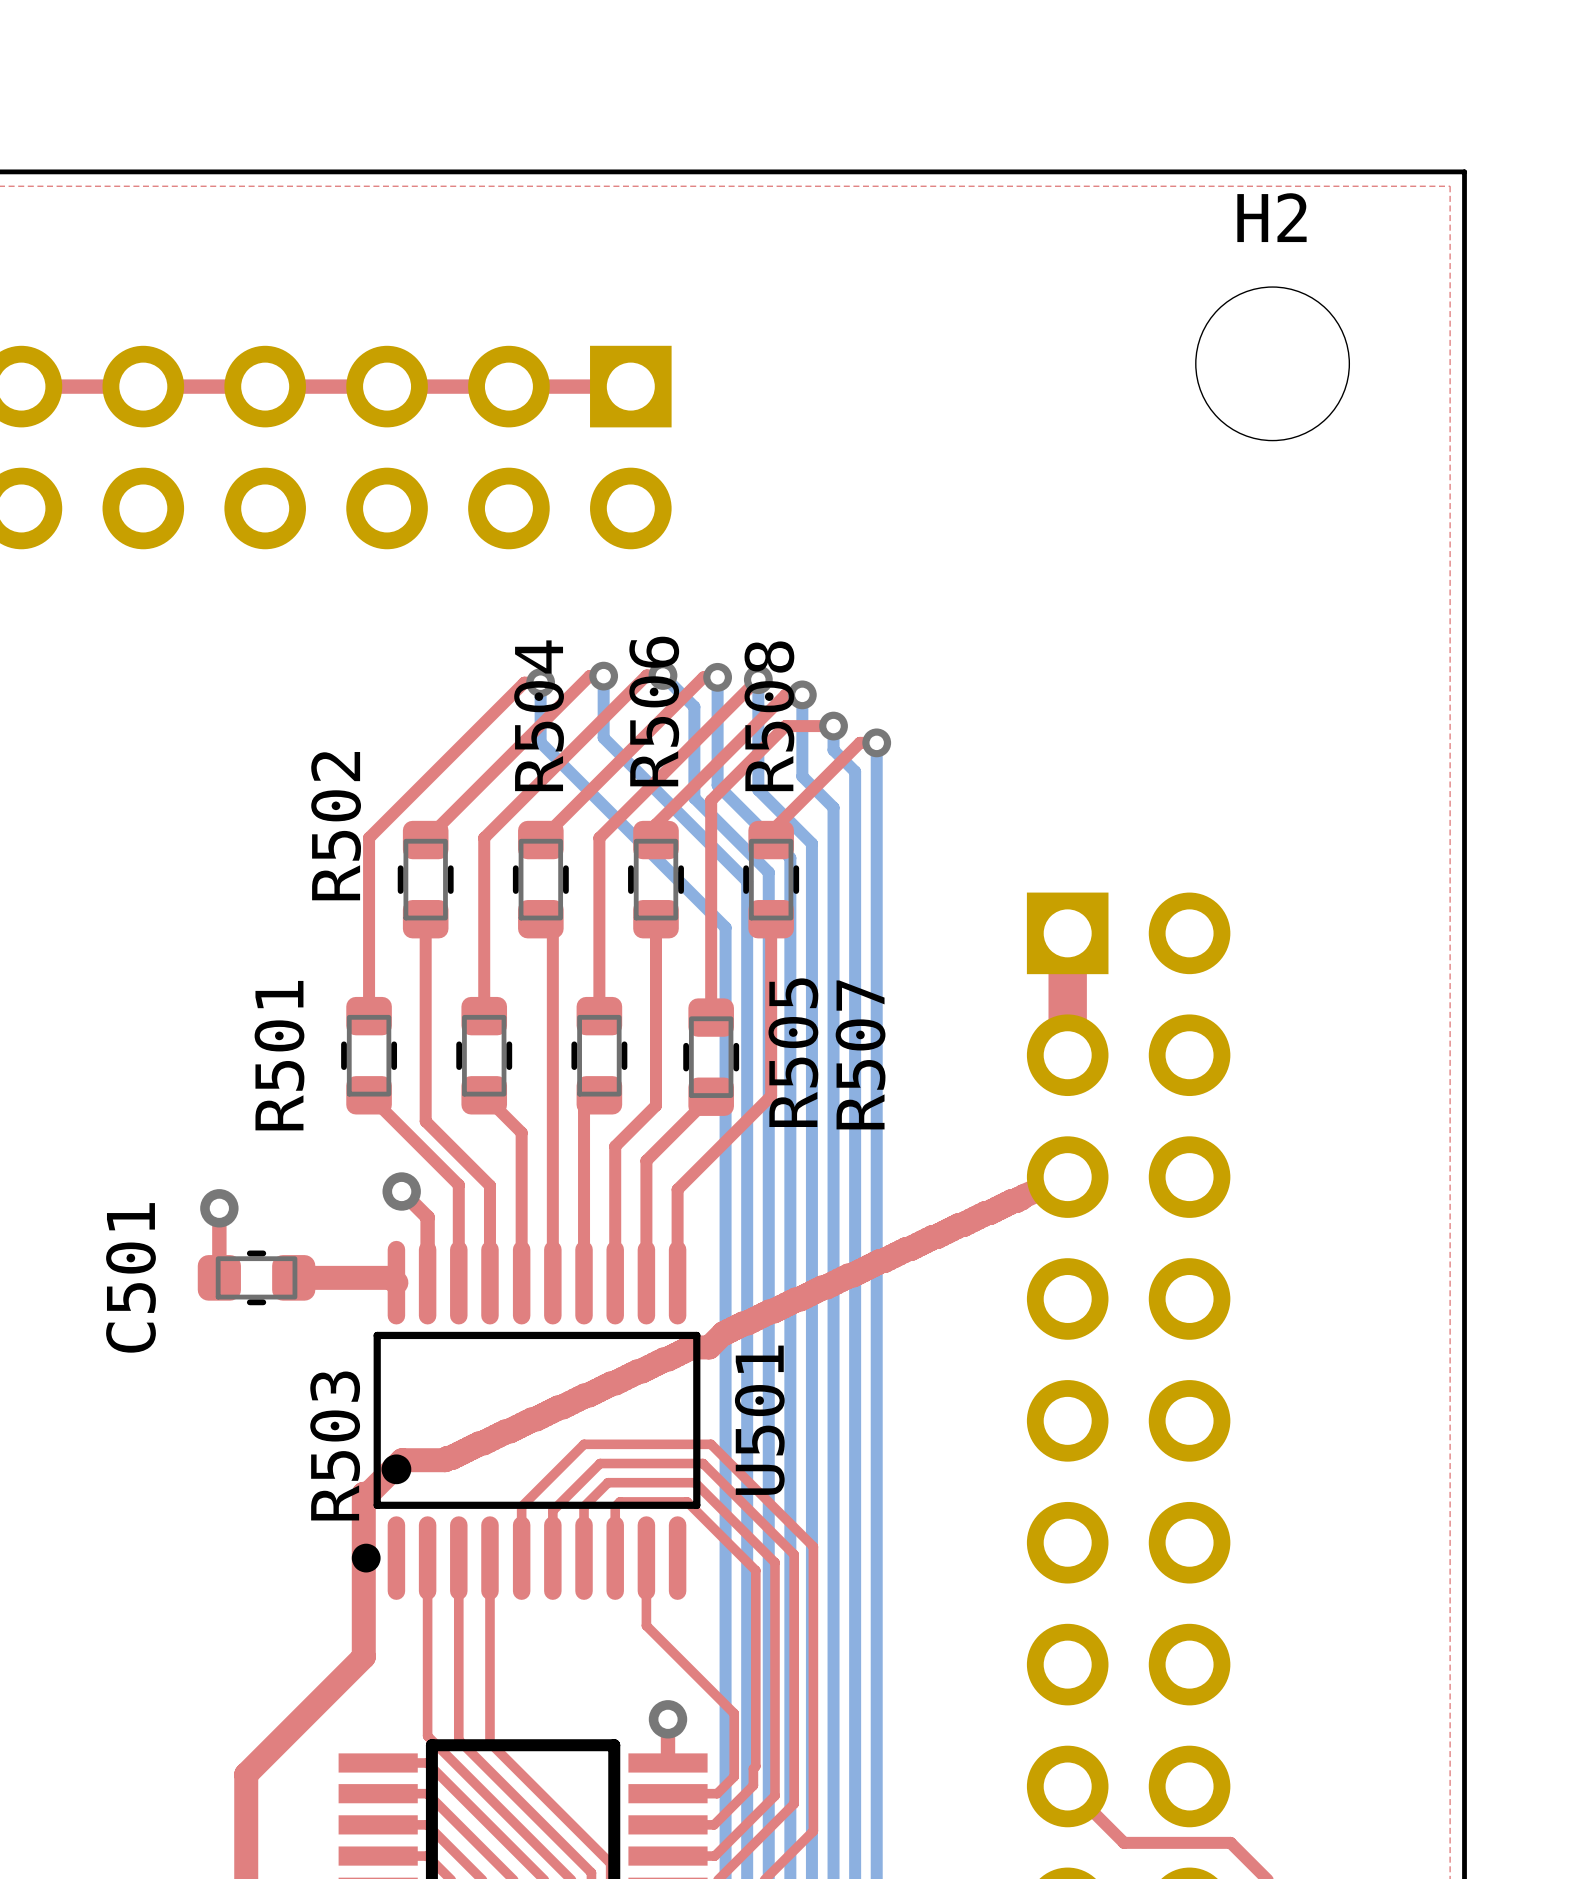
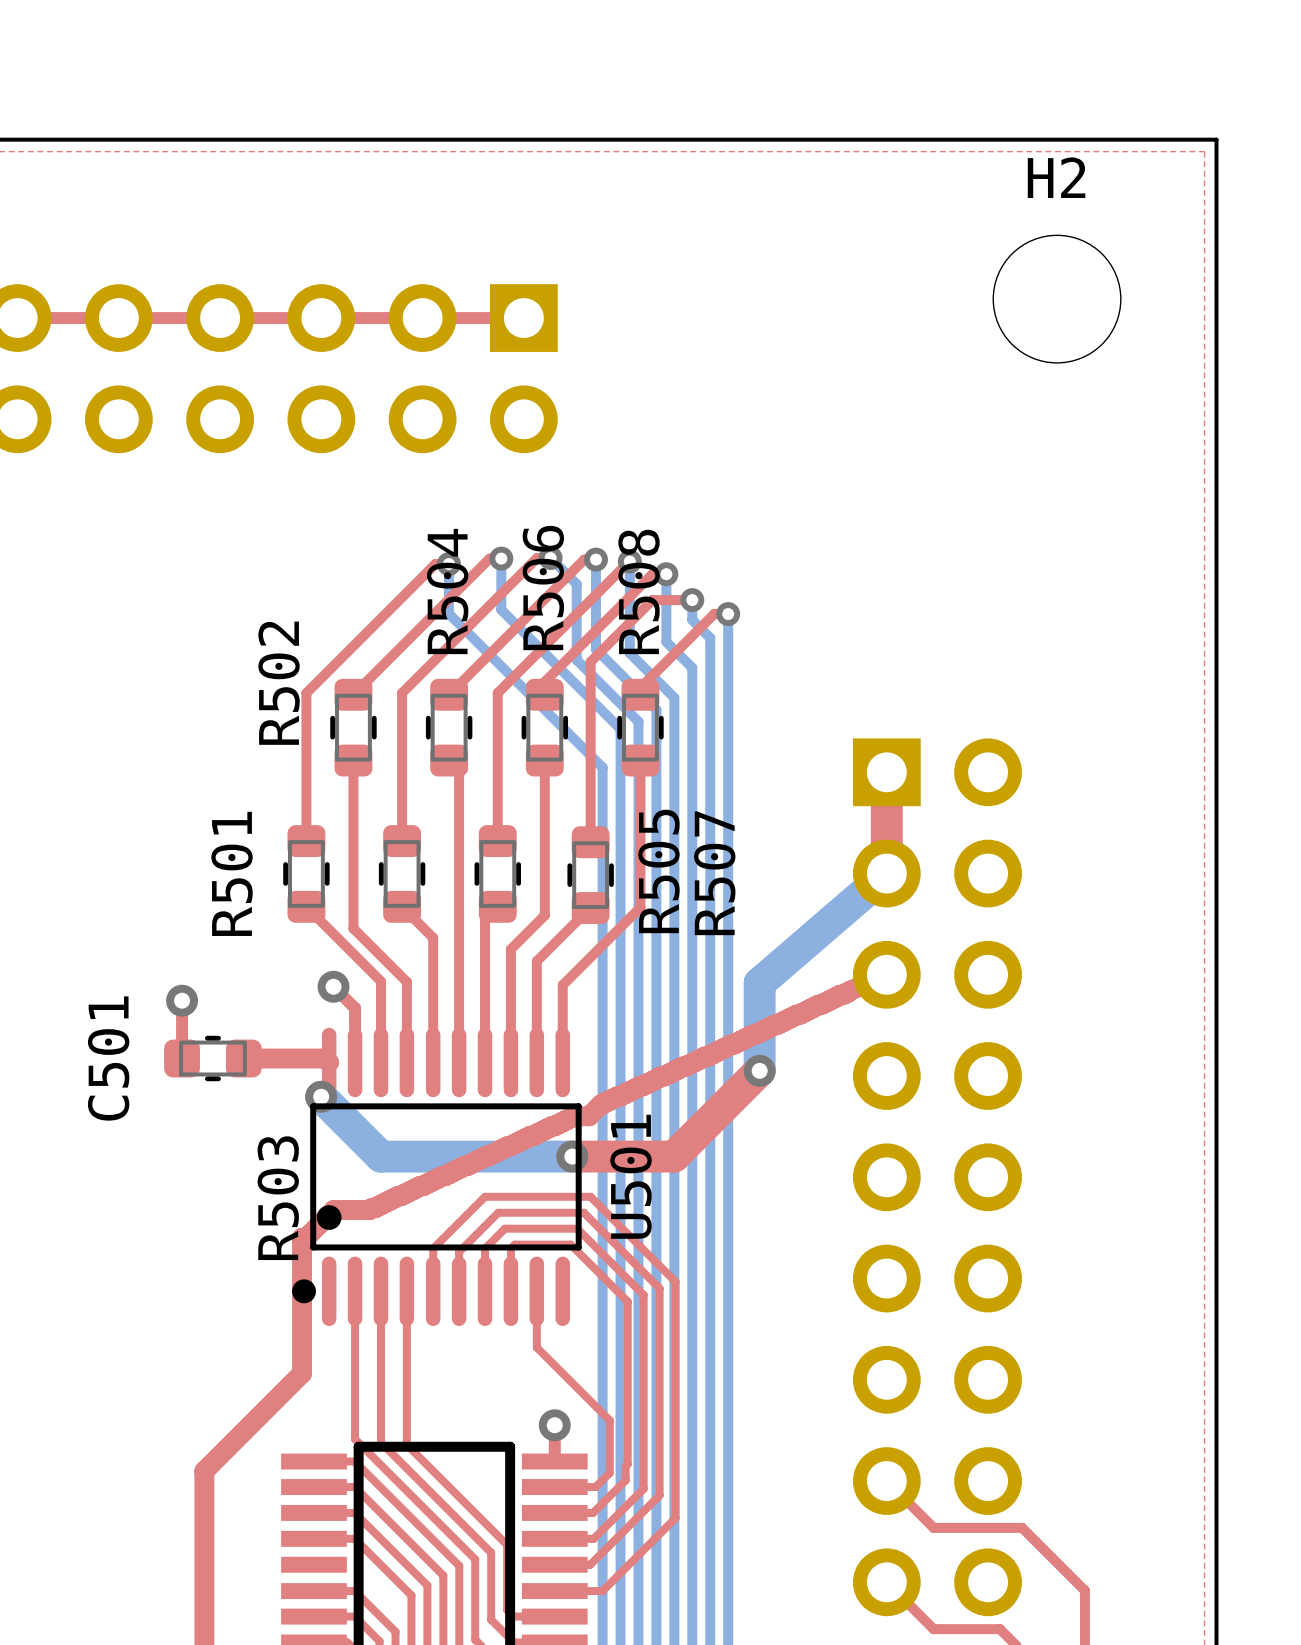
bottom track: none -> (886, 873) (759, 983) (759, 1070)
top track: none -> (759, 1070) (673, 1156) (572, 1156)
via: none -> (759, 1070)
bottom track: none -> (321, 1096) (380, 1156) (572, 1156)
via: none -> (321, 1096)
via: none -> (572, 1156)

